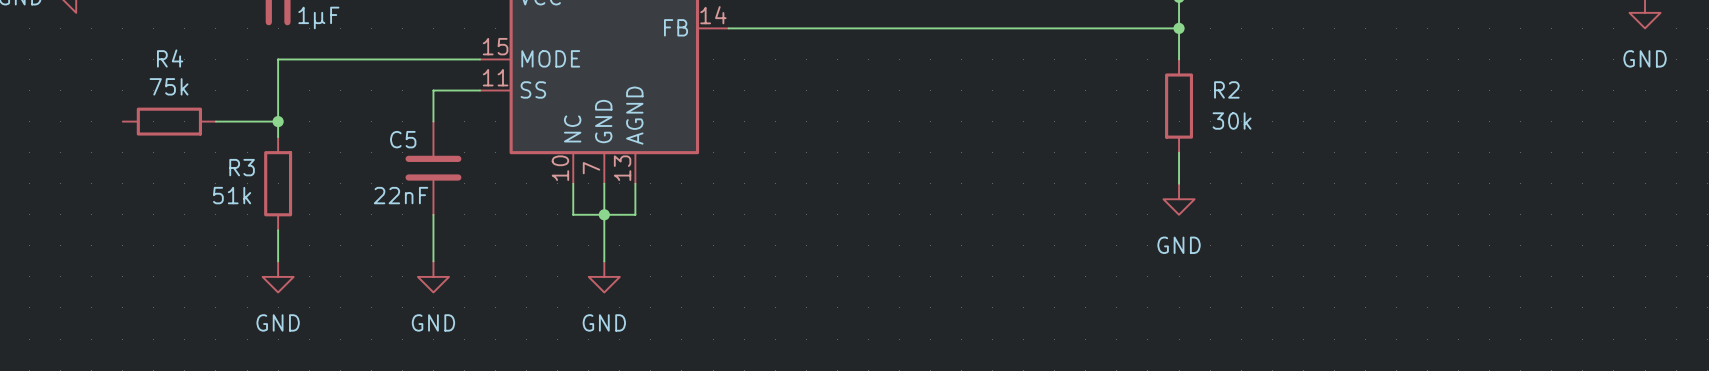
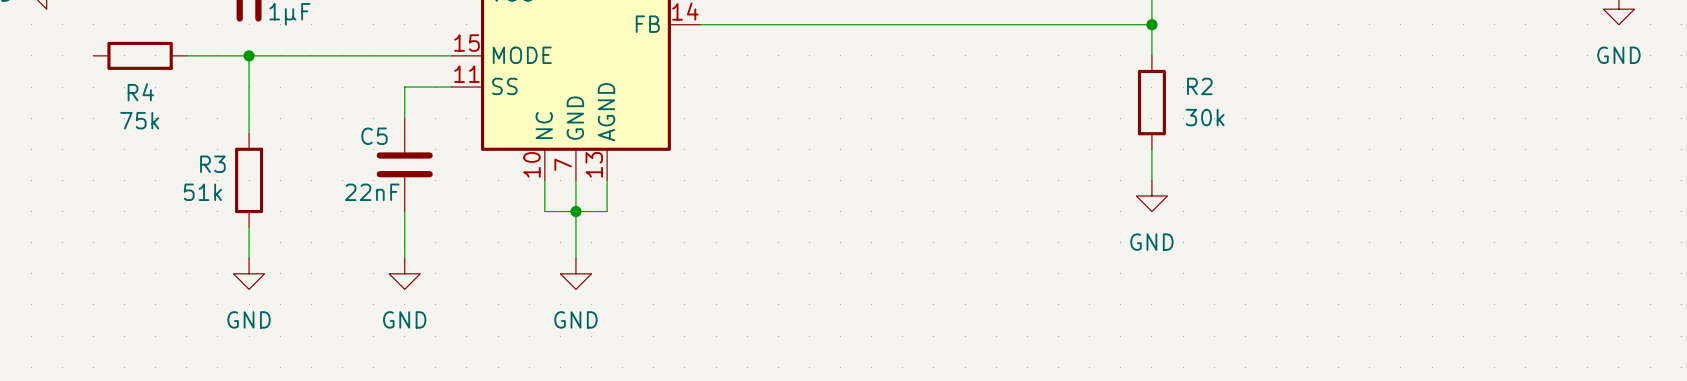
R4 name position: R4 (170, 58) -> R4 (140, 92)
R4 value position: 75k (169, 86) -> 75k (139, 120)
R4 position: (169, 121) -> (140, 55)
wire: (215, 121) (278, 121) -> (186, 55) (249, 55)
junction position: (278, 121) -> (249, 55)

